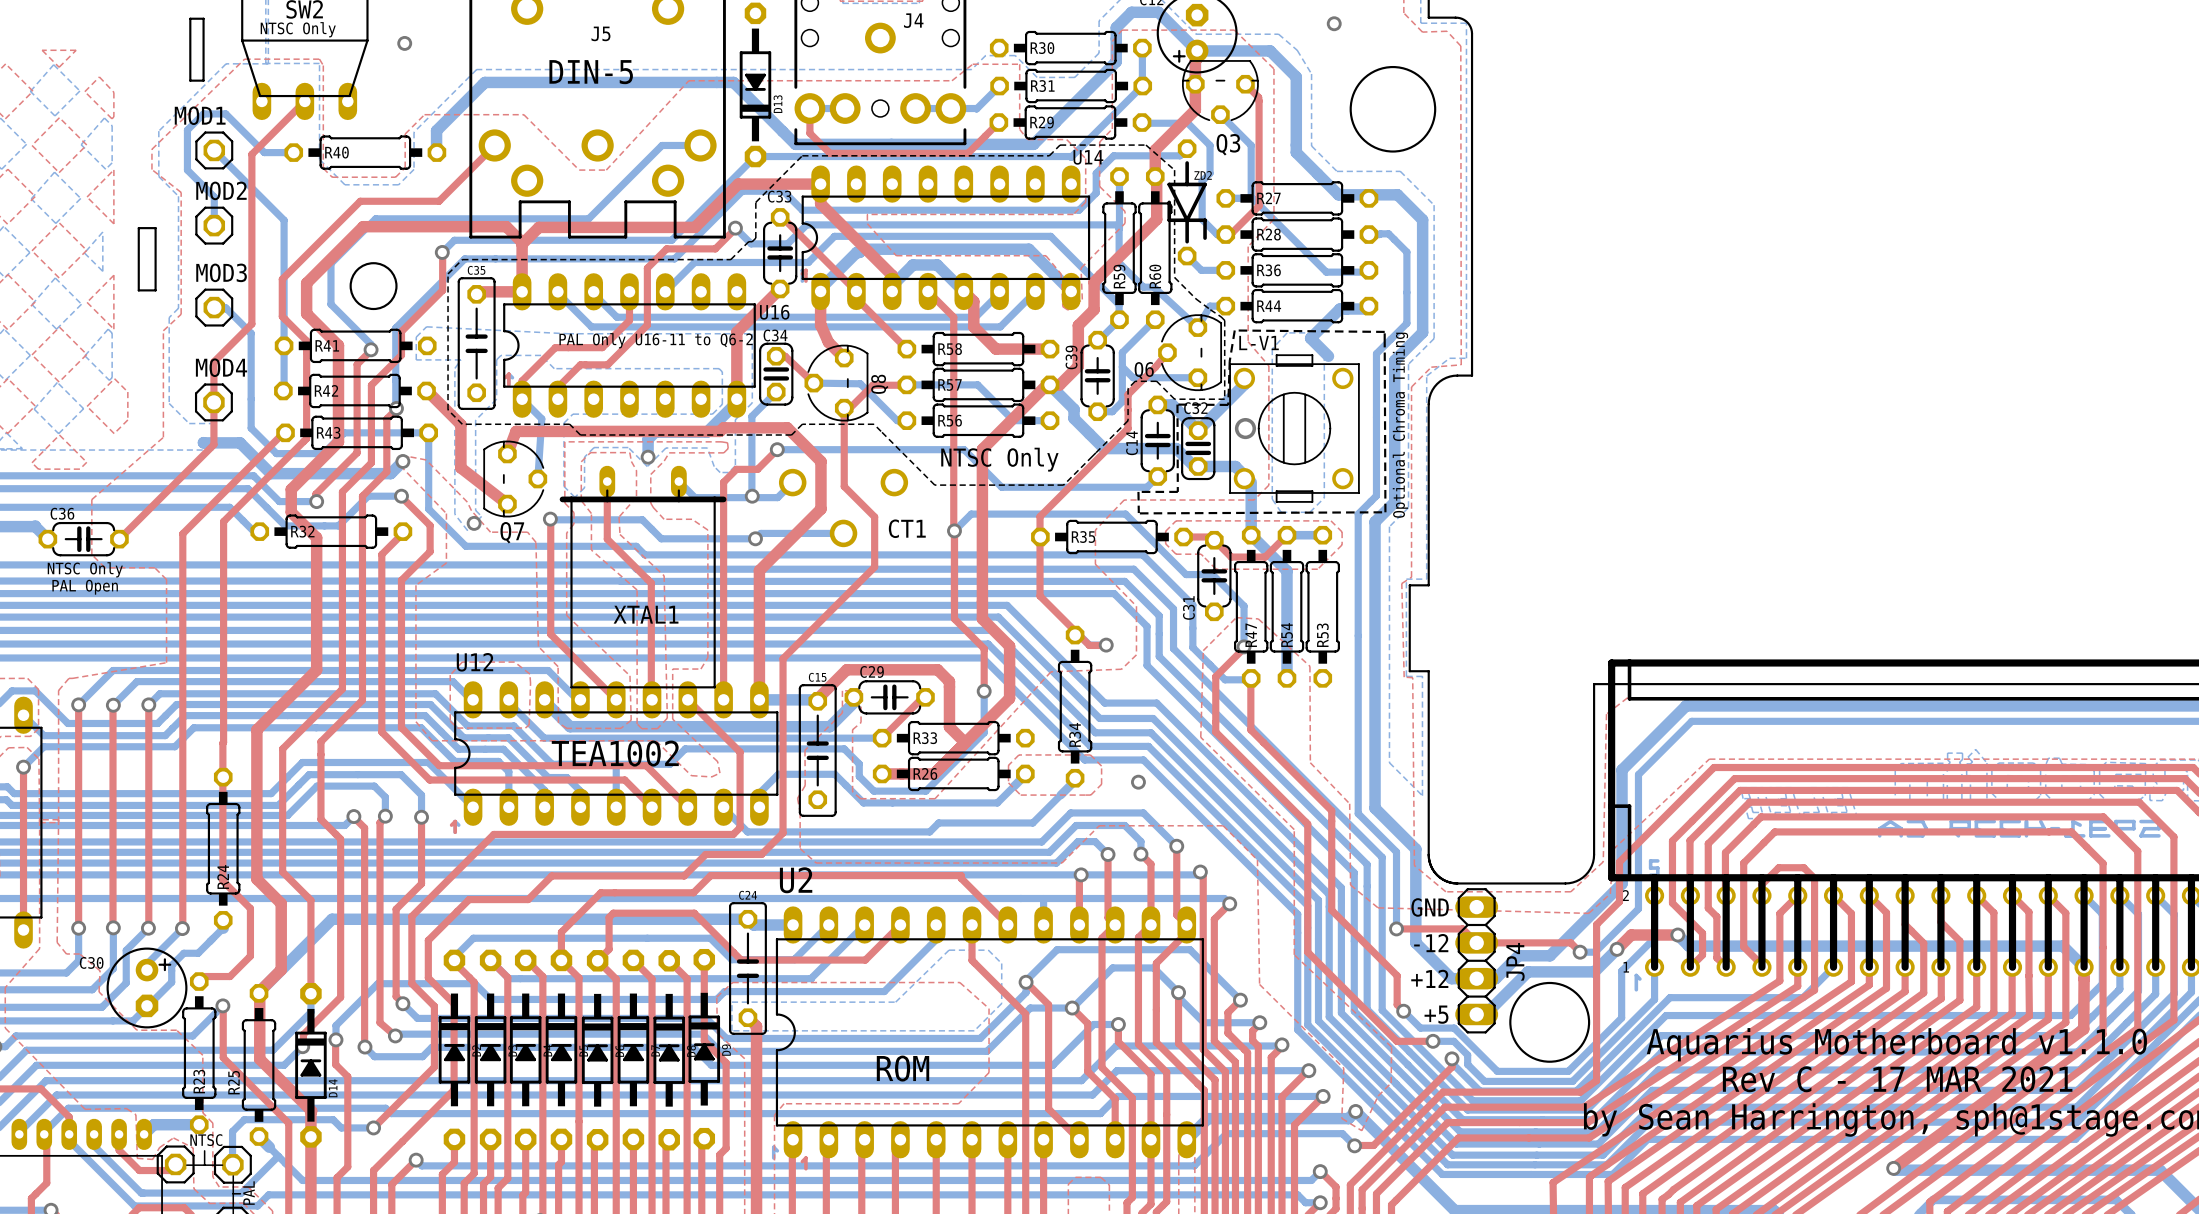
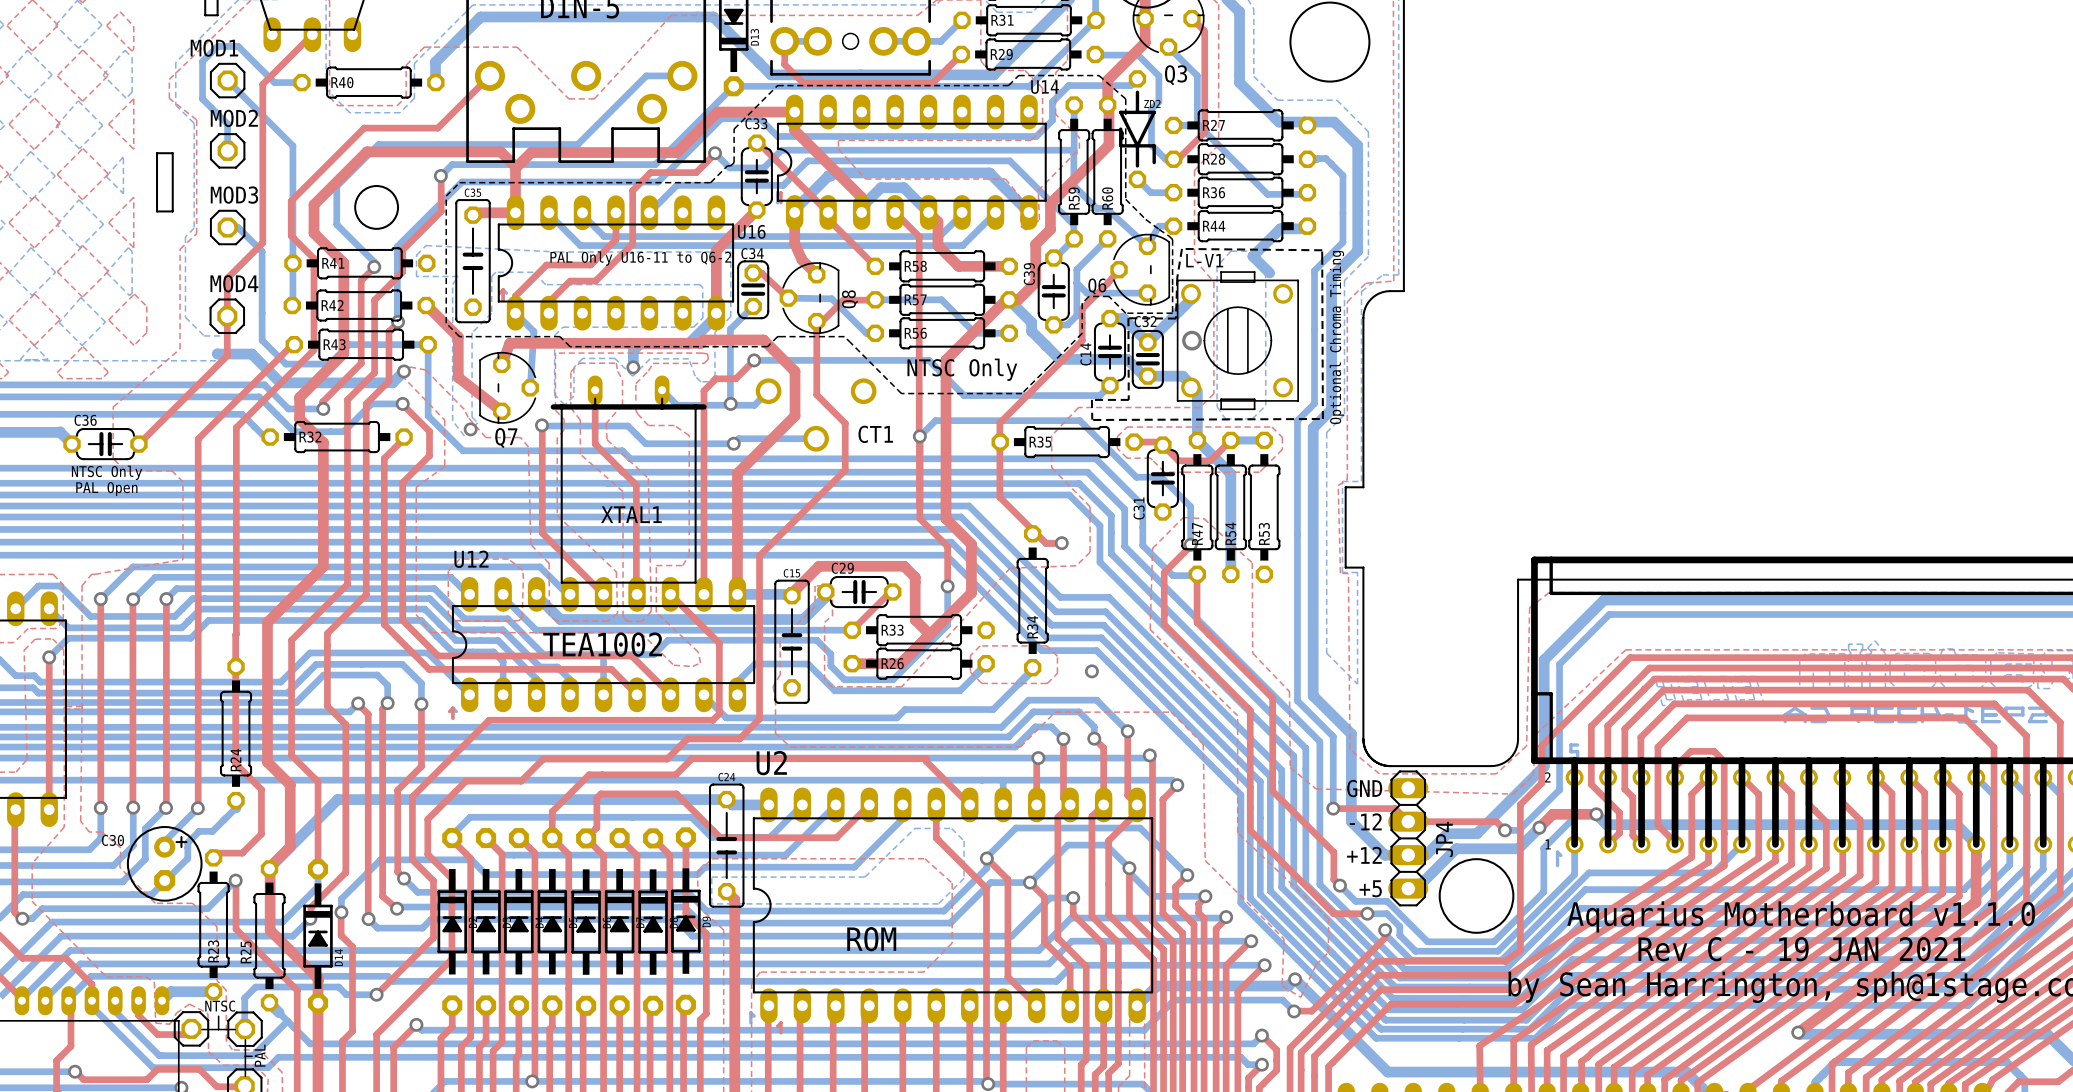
text: Rev C - 17 MAR 2021 (1897, 1079) -> Rev C - 19 JAN 2021 (1801, 949)

